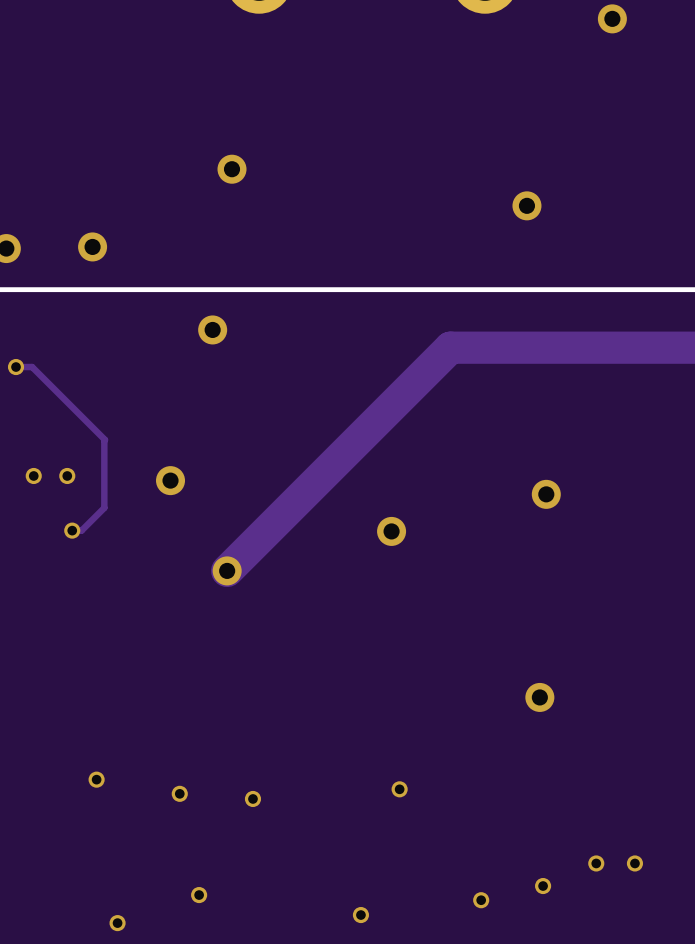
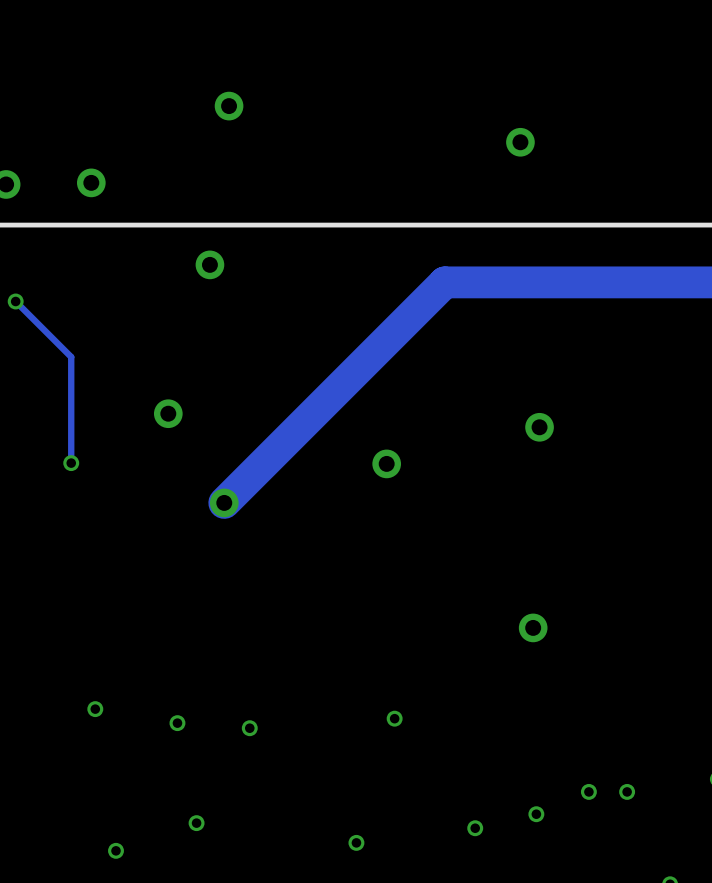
track: (16, 367) (32, 367) (104, 439) (104, 507) (81, 530) (72, 530) -> (15, 301) (71, 357) (71, 463)
via: (33, 475) -> none
via: (67, 475) -> none

